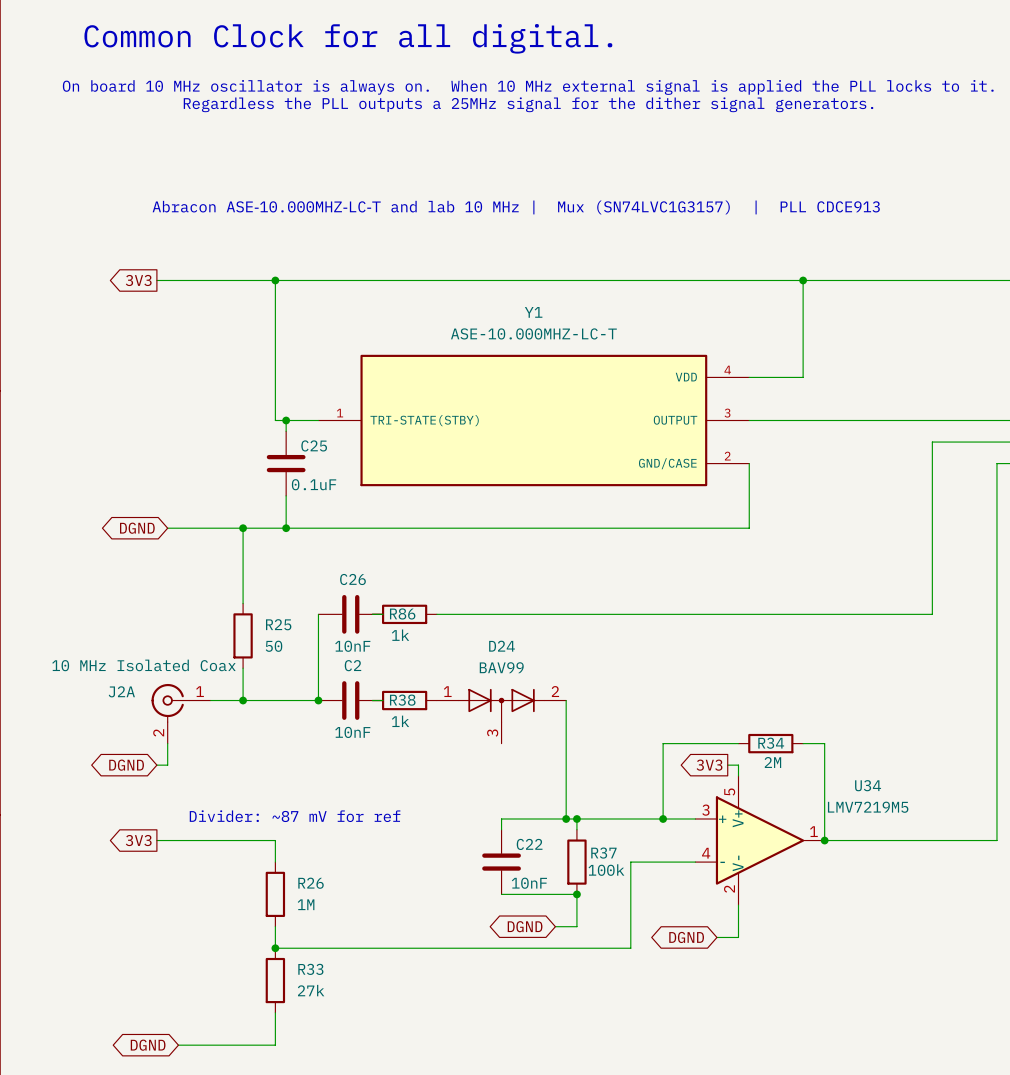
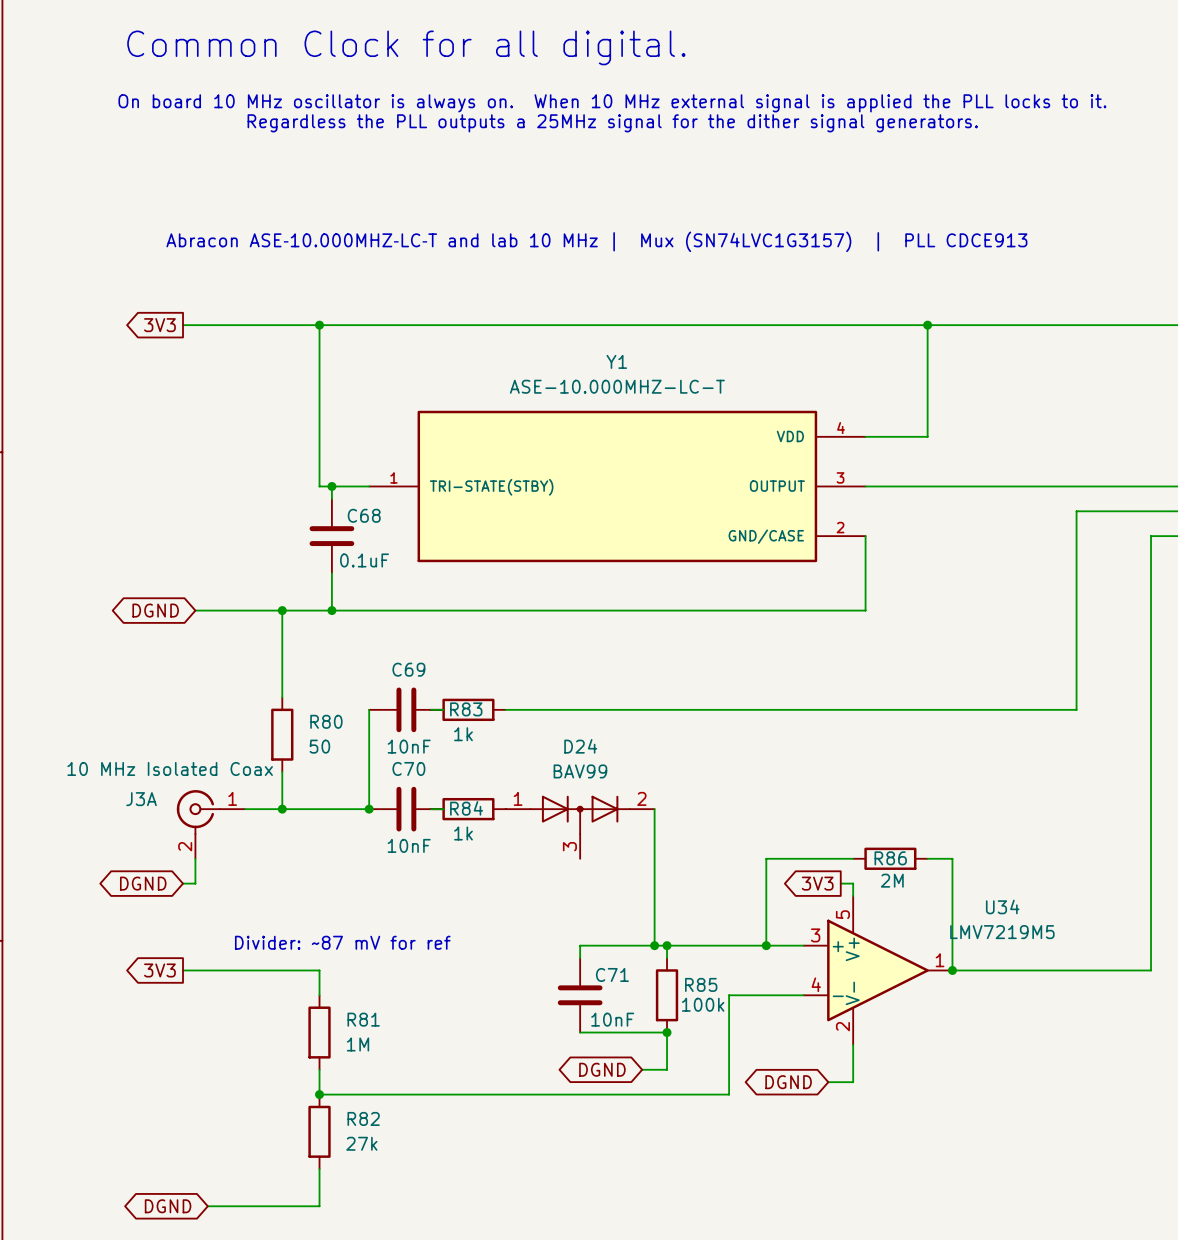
C25 name: C25 (314, 445) -> C68 (364, 515)
C26 name: C26 (352, 579) -> C69 (408, 669)
R86 name: R86 (402, 613) -> R83 (466, 709)
R25 name: R25 (278, 624) -> R80 (326, 721)
C2 name: C2 (352, 665) -> C70 (408, 768)
J2A name: J2A (121, 691) -> J3A (141, 799)
R38 name: R38 (402, 700) -> R84 (466, 808)
R34 name: R34 (771, 743) -> R86 (890, 858)
C22 name: C22 (529, 844) -> C71 (612, 974)
R37 name: R37 (603, 853) -> R85 (701, 984)
R26 name: R26 (311, 883) -> R81 (363, 1019)
R33 name: R33 (310, 969) -> R82 (363, 1118)

